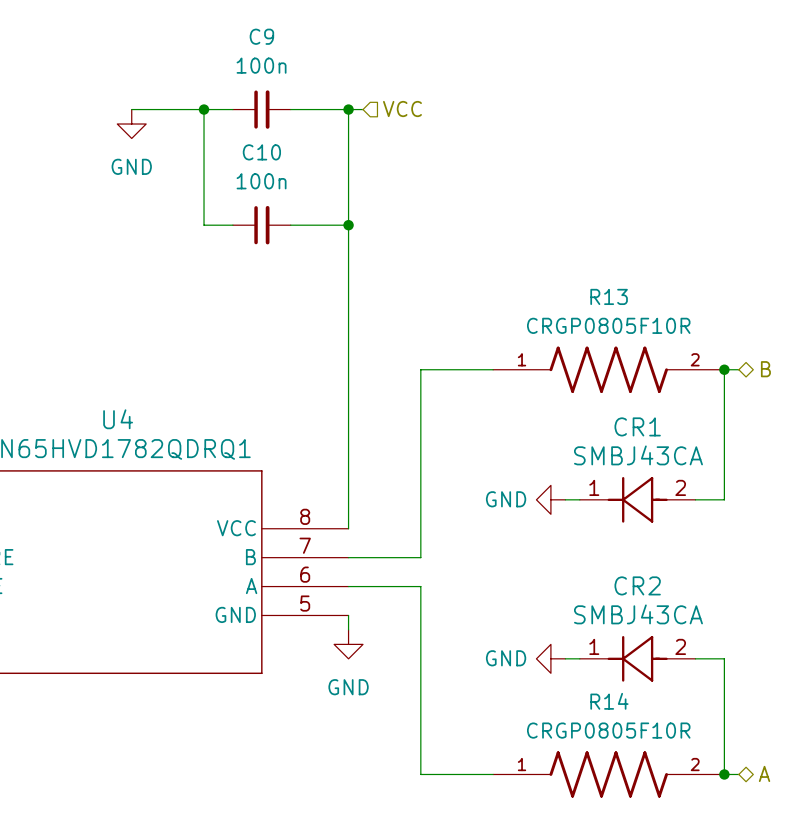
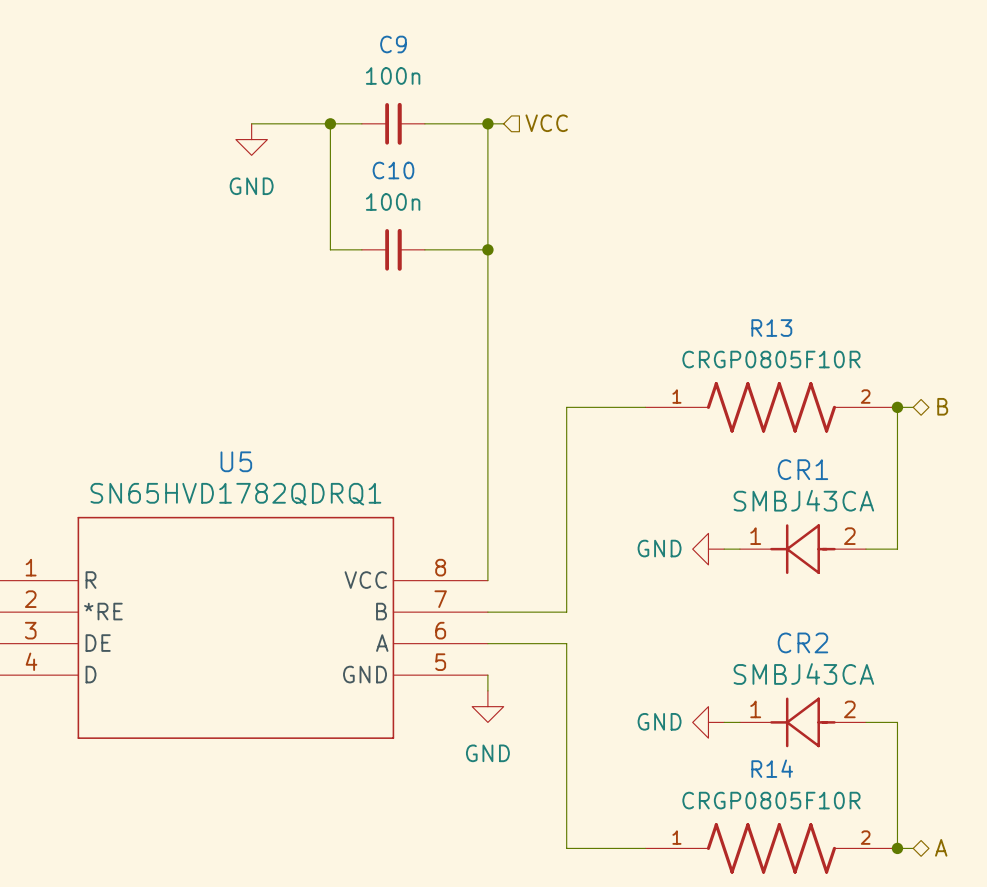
U4 name: U4 (118, 419) -> U5 (236, 461)

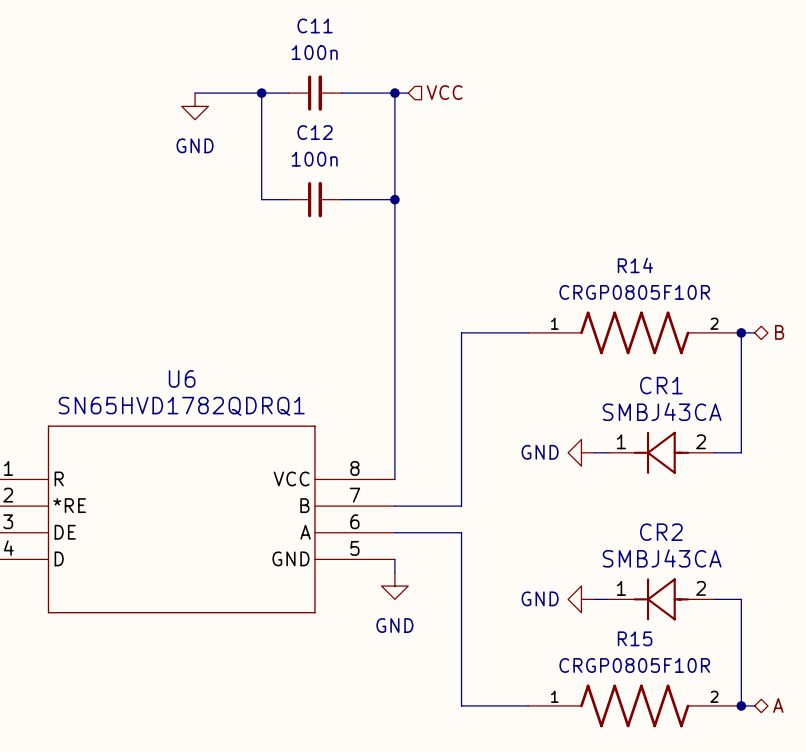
C9 name: C9 (393, 44) -> C11 (315, 25)
C10 name: C10 (393, 170) -> C12 (315, 132)
R13 name: R13 (771, 328) -> R14 (635, 265)
U5 name: U5 (236, 461) -> U6 (182, 378)
R14 name: R14 (772, 768) -> R15 (635, 638)

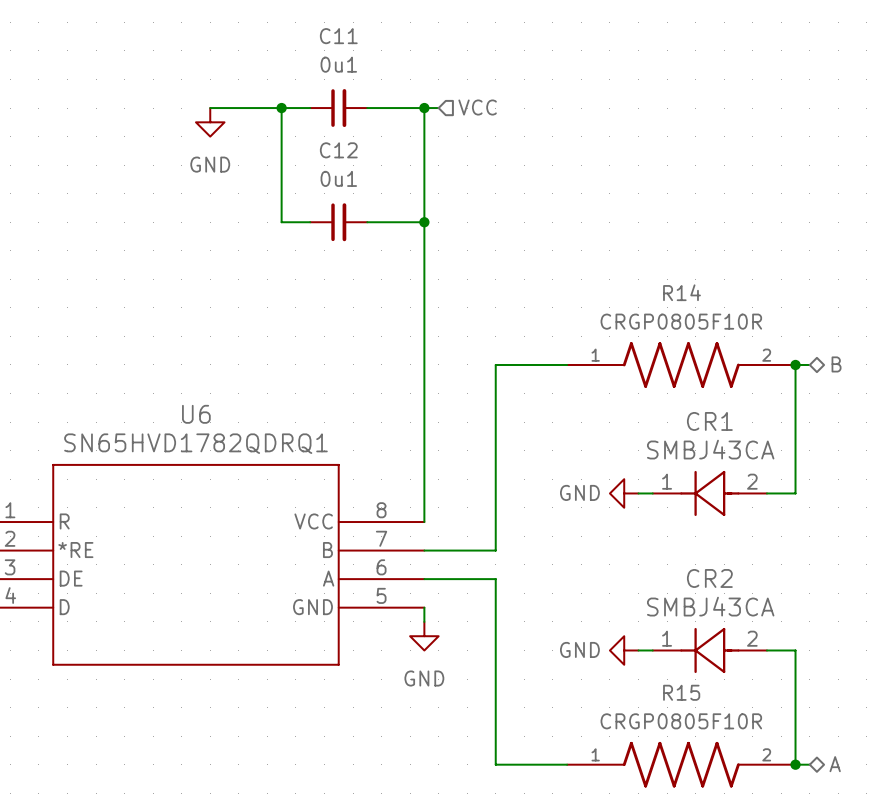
C11 value: 100n (314, 52) -> 0u1 (338, 64)
C12 value: 100n (314, 159) -> 0u1 (338, 178)

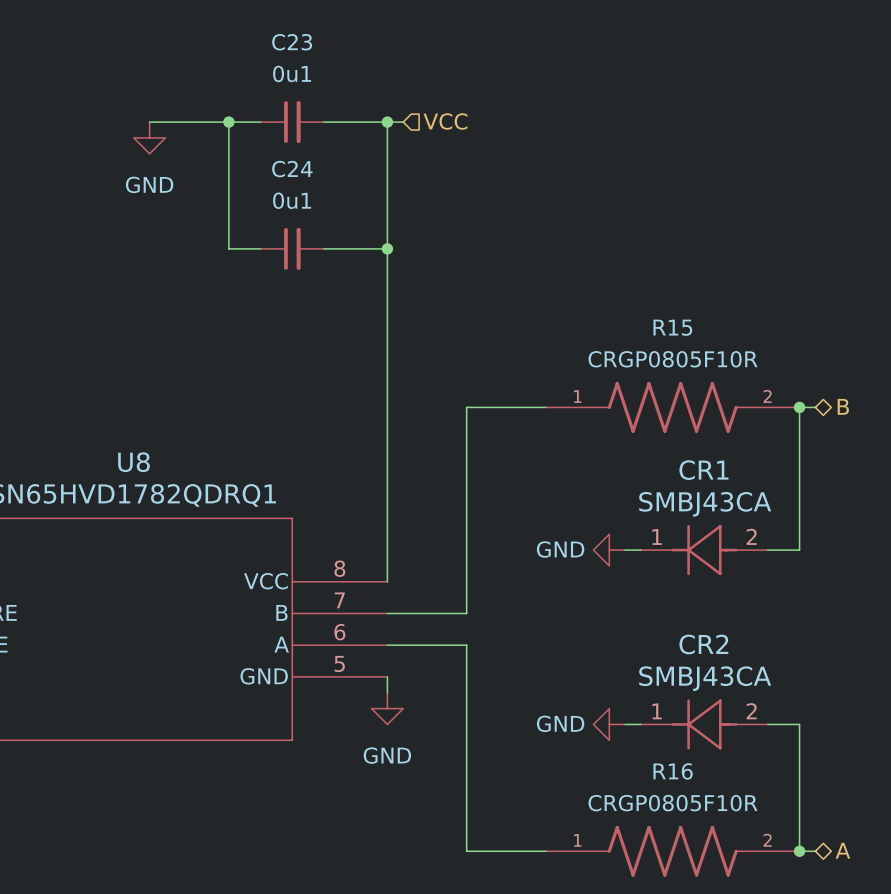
C11 name: C11 (338, 36) -> C23 (292, 42)
C12 name: C12 (338, 150) -> C24 (292, 169)
R14 name: R14 (682, 292) -> R15 (672, 327)
U6 name: U6 (196, 414) -> U8 (134, 462)
R15 name: R15 (681, 692) -> R16 (673, 771)

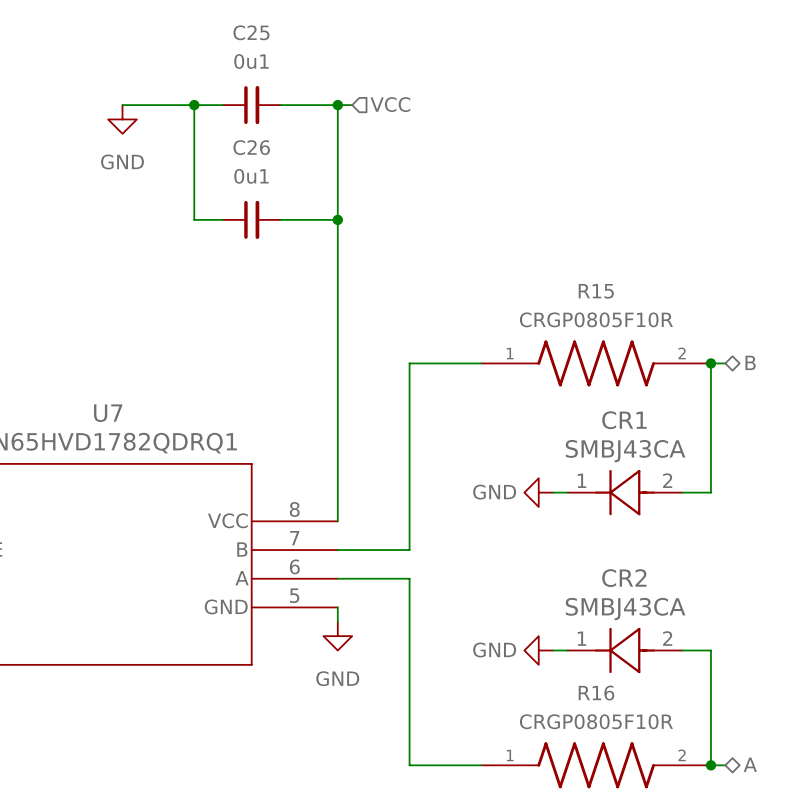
C23 name: C23 (292, 42) -> C25 (251, 32)
C24 name: C24 (292, 169) -> C26 (251, 147)
U8 name: U8 (134, 462) -> U7 (108, 413)

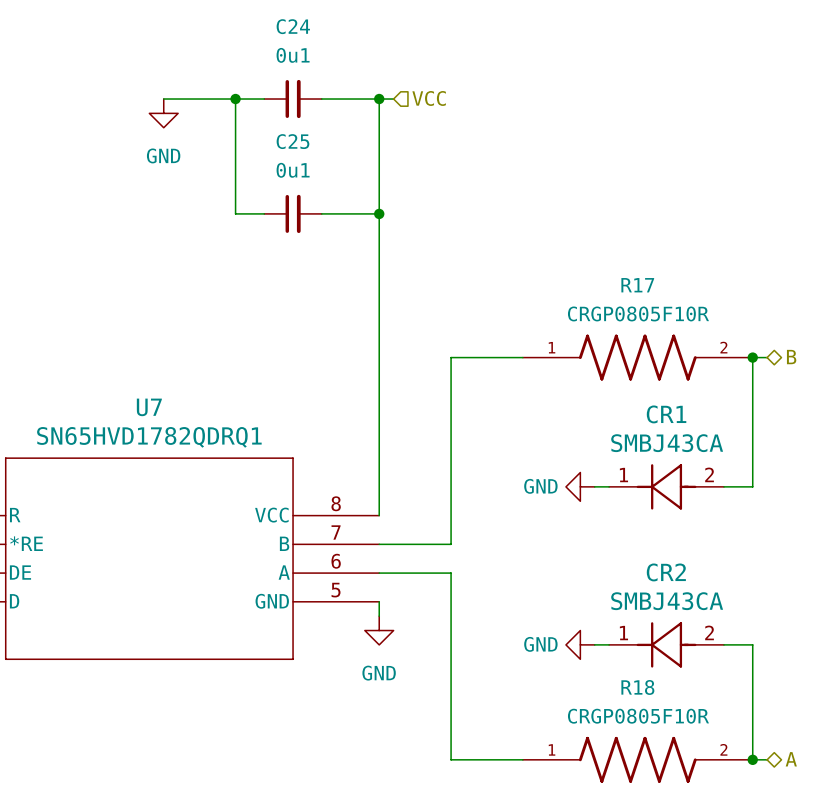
C25 name: C25 (251, 32) -> C24 (293, 26)
C26 name: C26 (251, 147) -> C25 (292, 141)
R15 name: R15 (596, 291) -> R17 (637, 285)
R16 name: R16 (596, 693) -> R18 (637, 687)

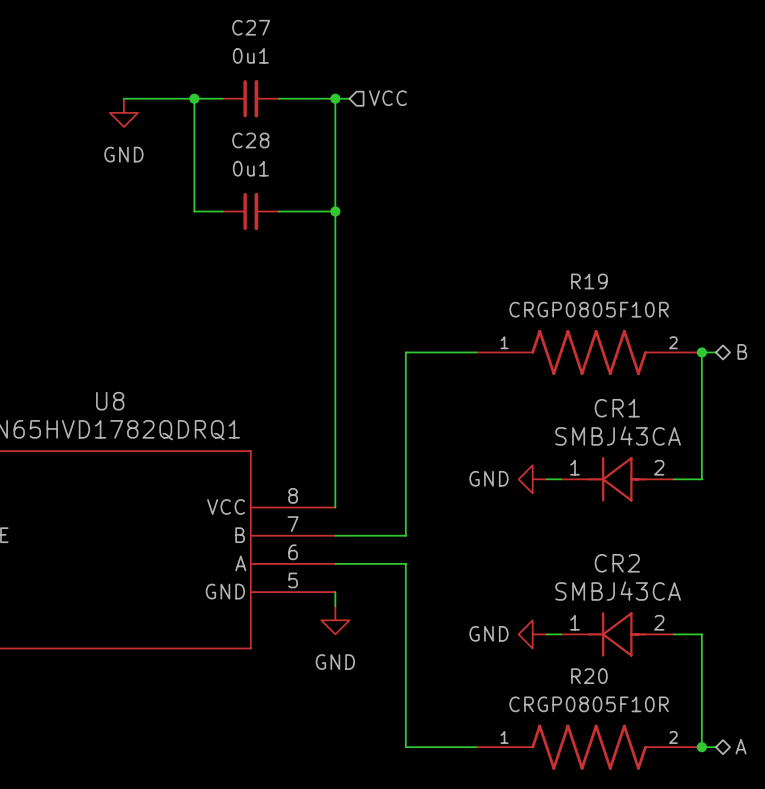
C24 name: C24 (293, 26) -> C27 (251, 27)
C25 name: C25 (292, 141) -> C28 (250, 140)
R17 name: R17 (637, 285) -> R19 (589, 281)
U7 name: U7 (149, 407) -> U8 (110, 401)
R18 name: R18 (637, 687) -> R20 (589, 676)

